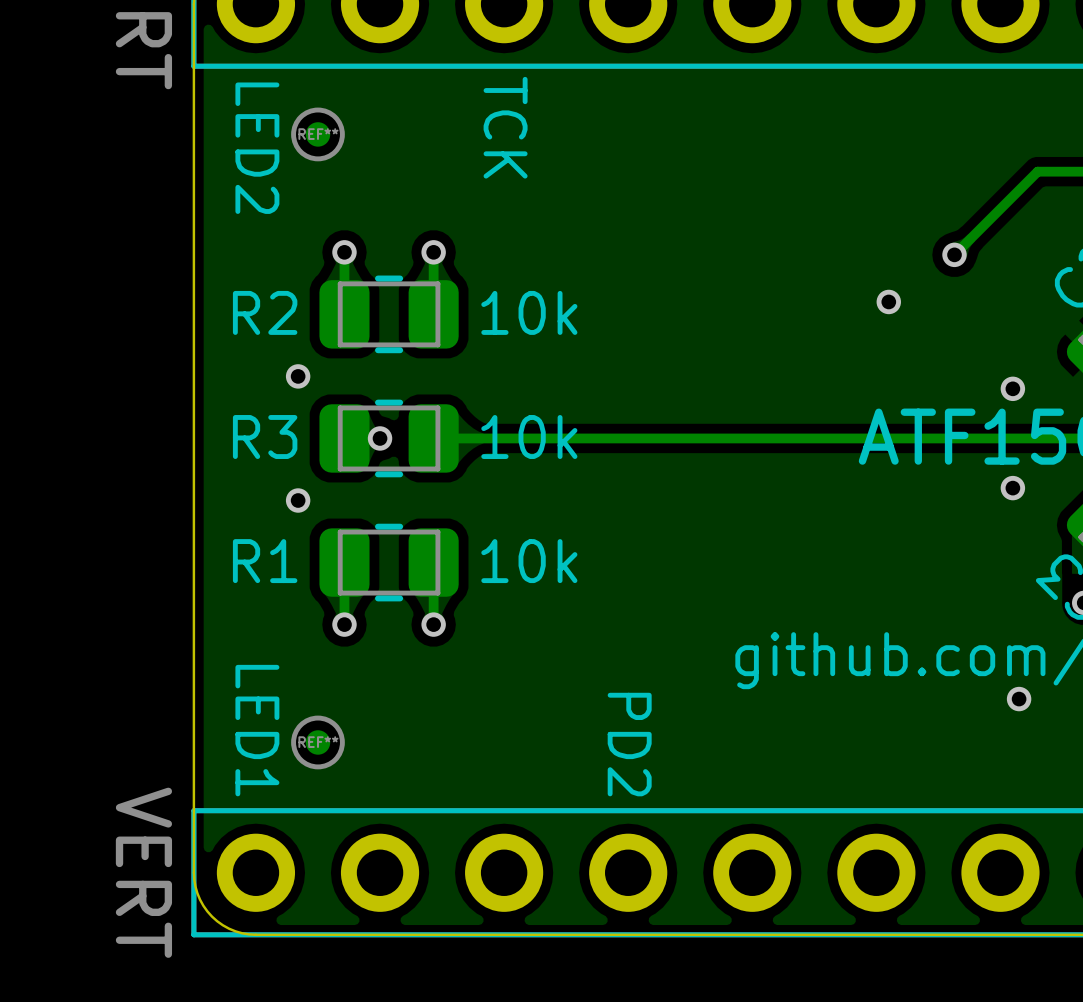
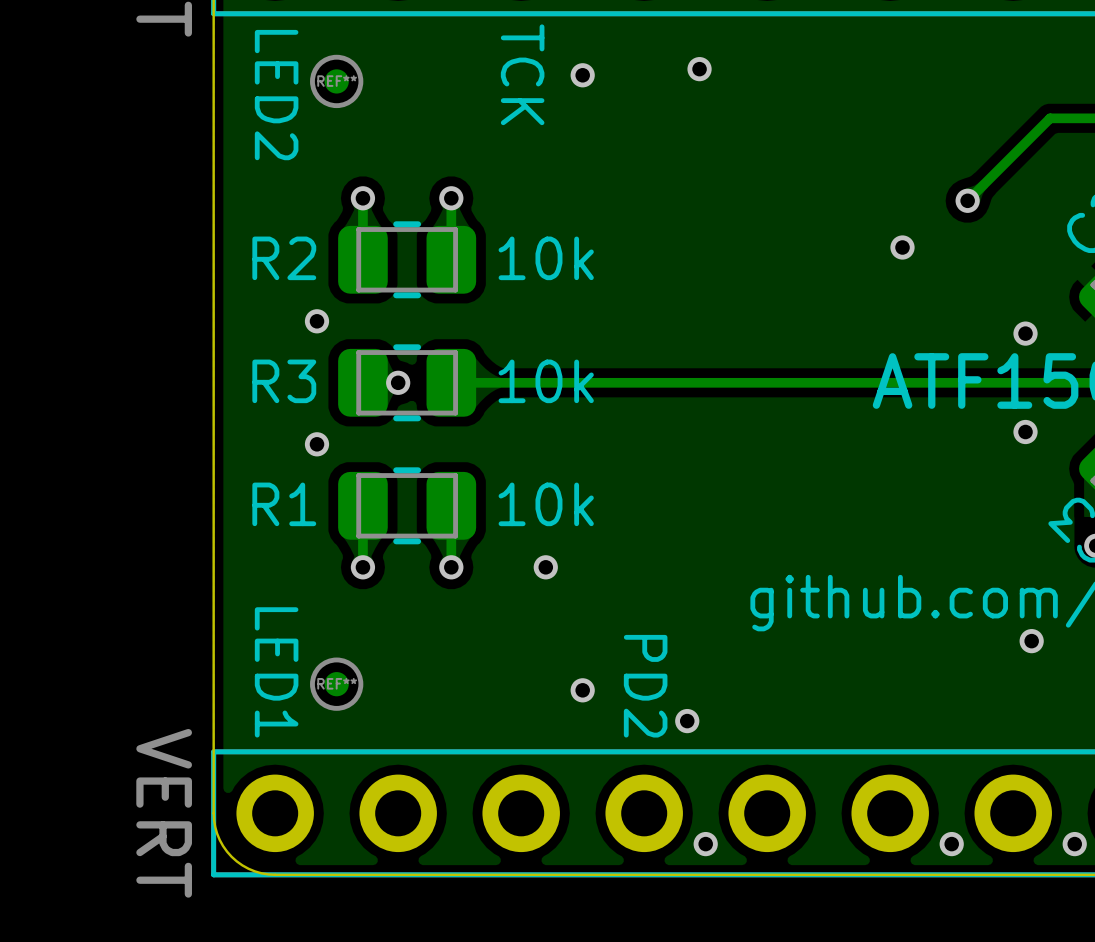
via: none -> (699, 69)
via: none -> (582, 75)
via: none -> (545, 567)
via: none -> (582, 690)
via: none -> (687, 721)
via: none -> (705, 844)
via: none -> (951, 844)
via: none -> (1074, 844)

